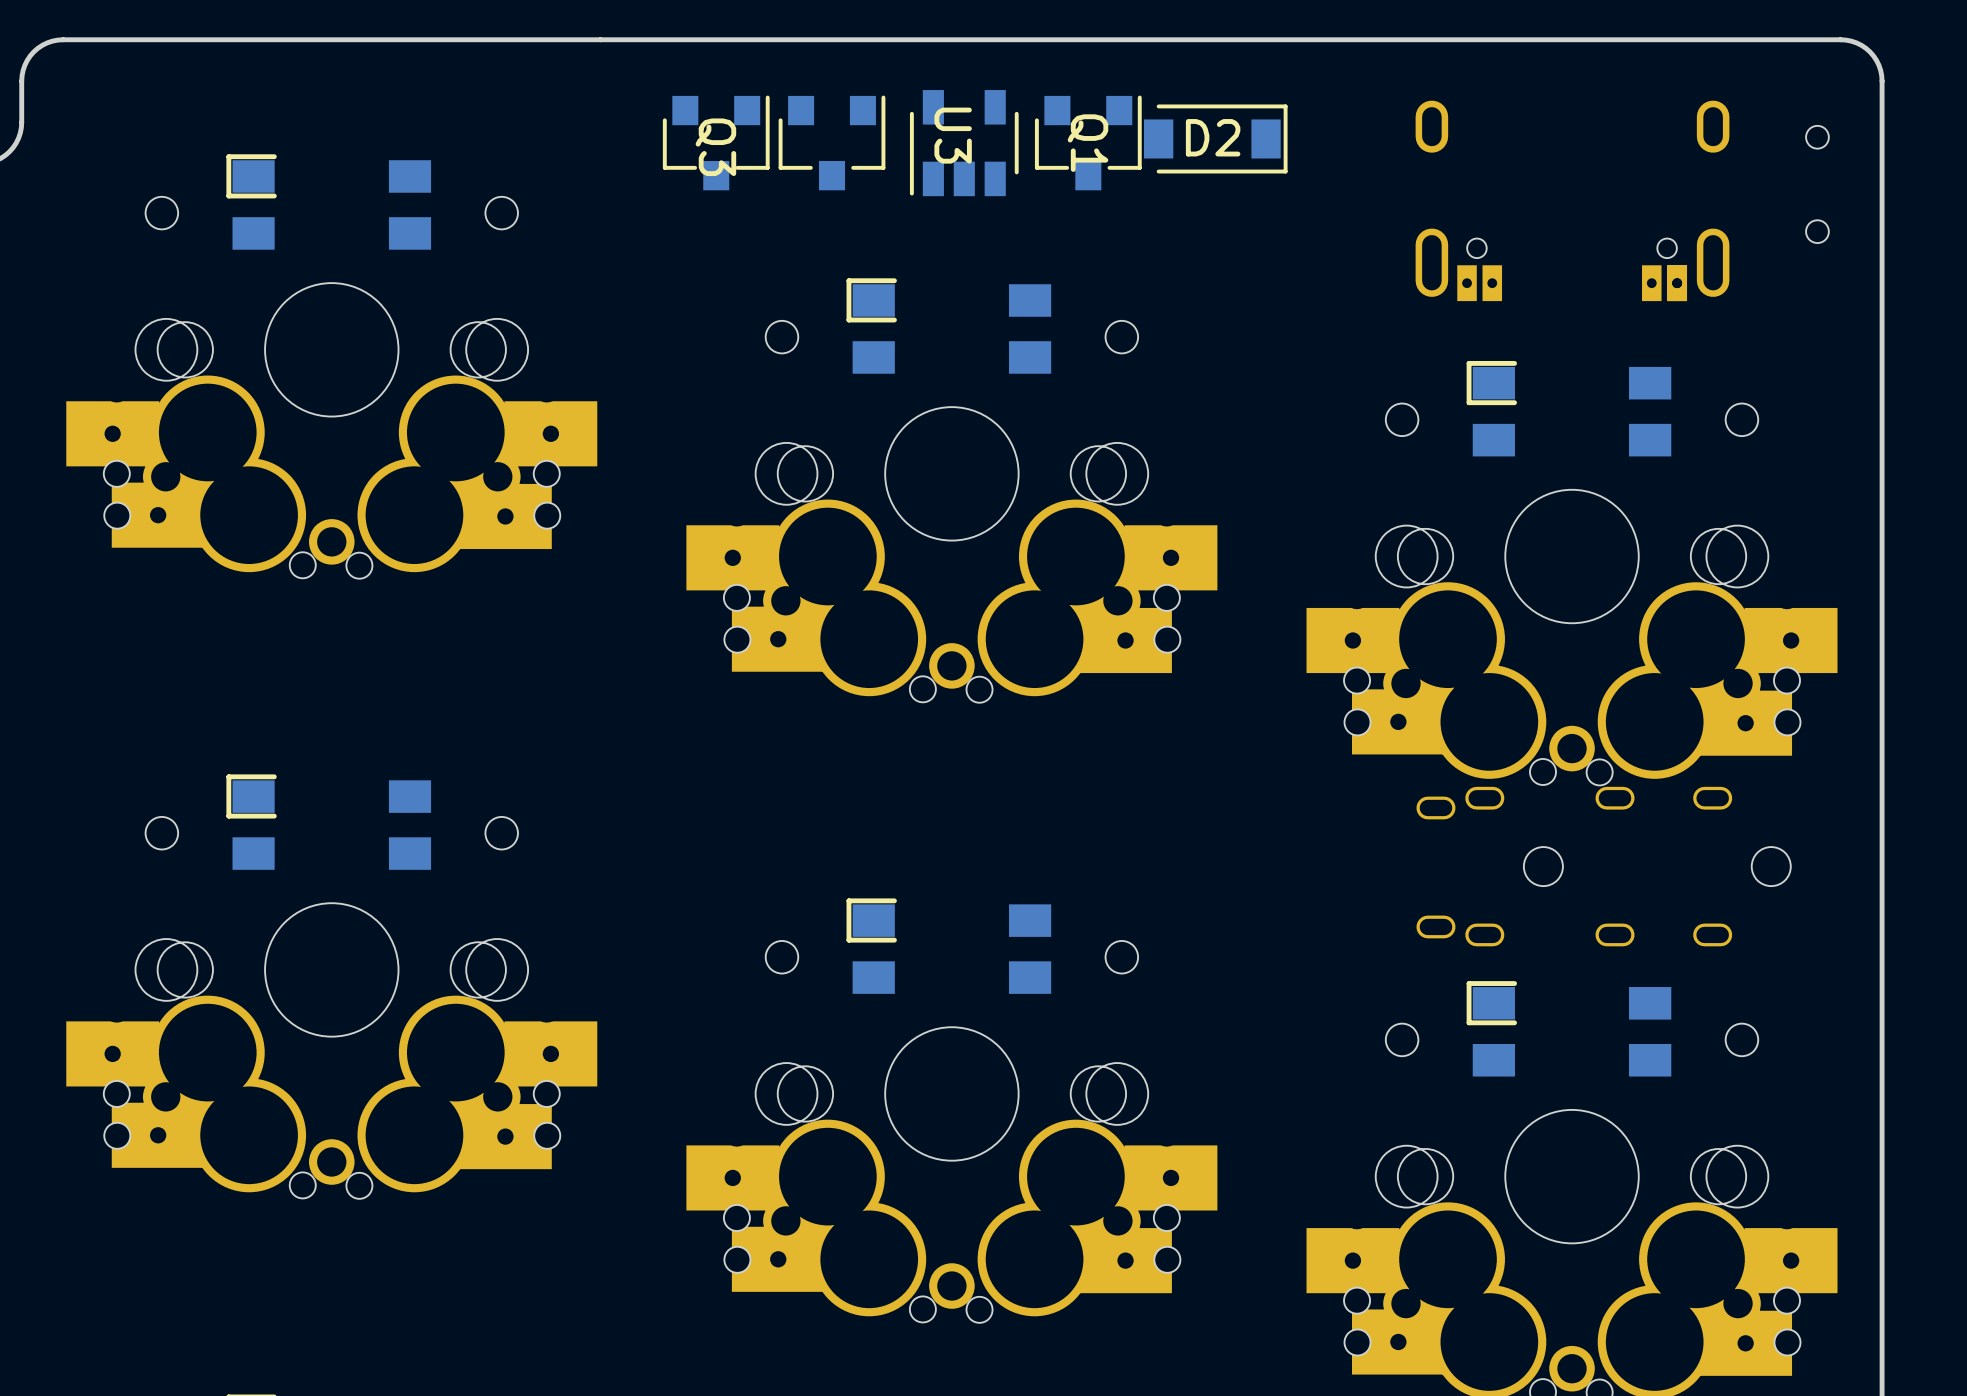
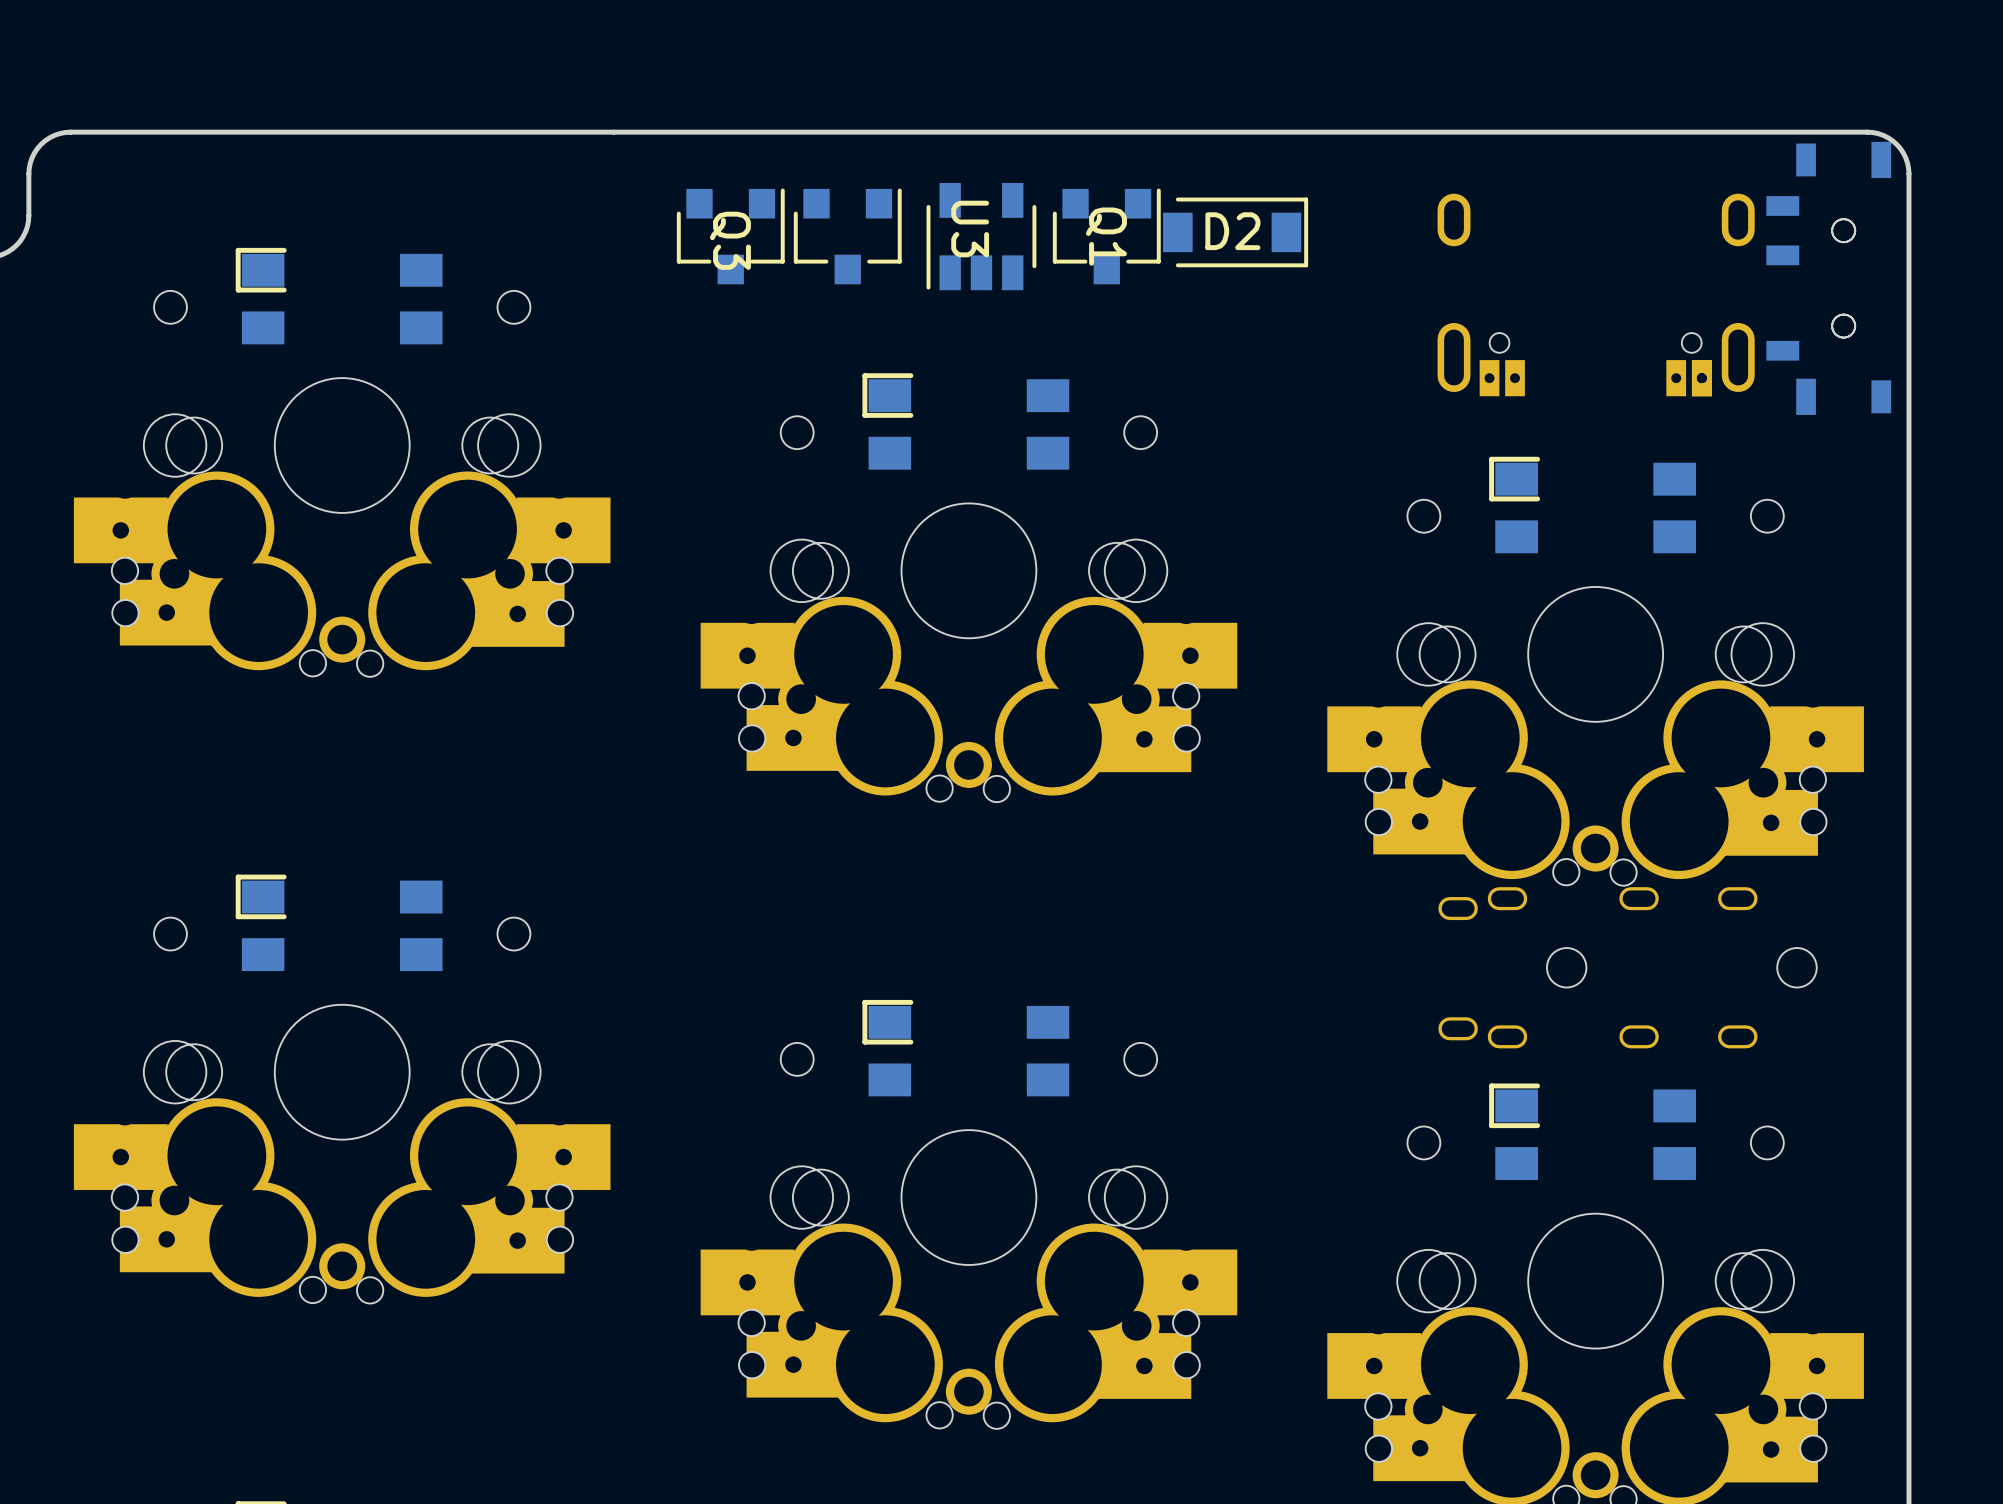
part: none -> (1828, 278)

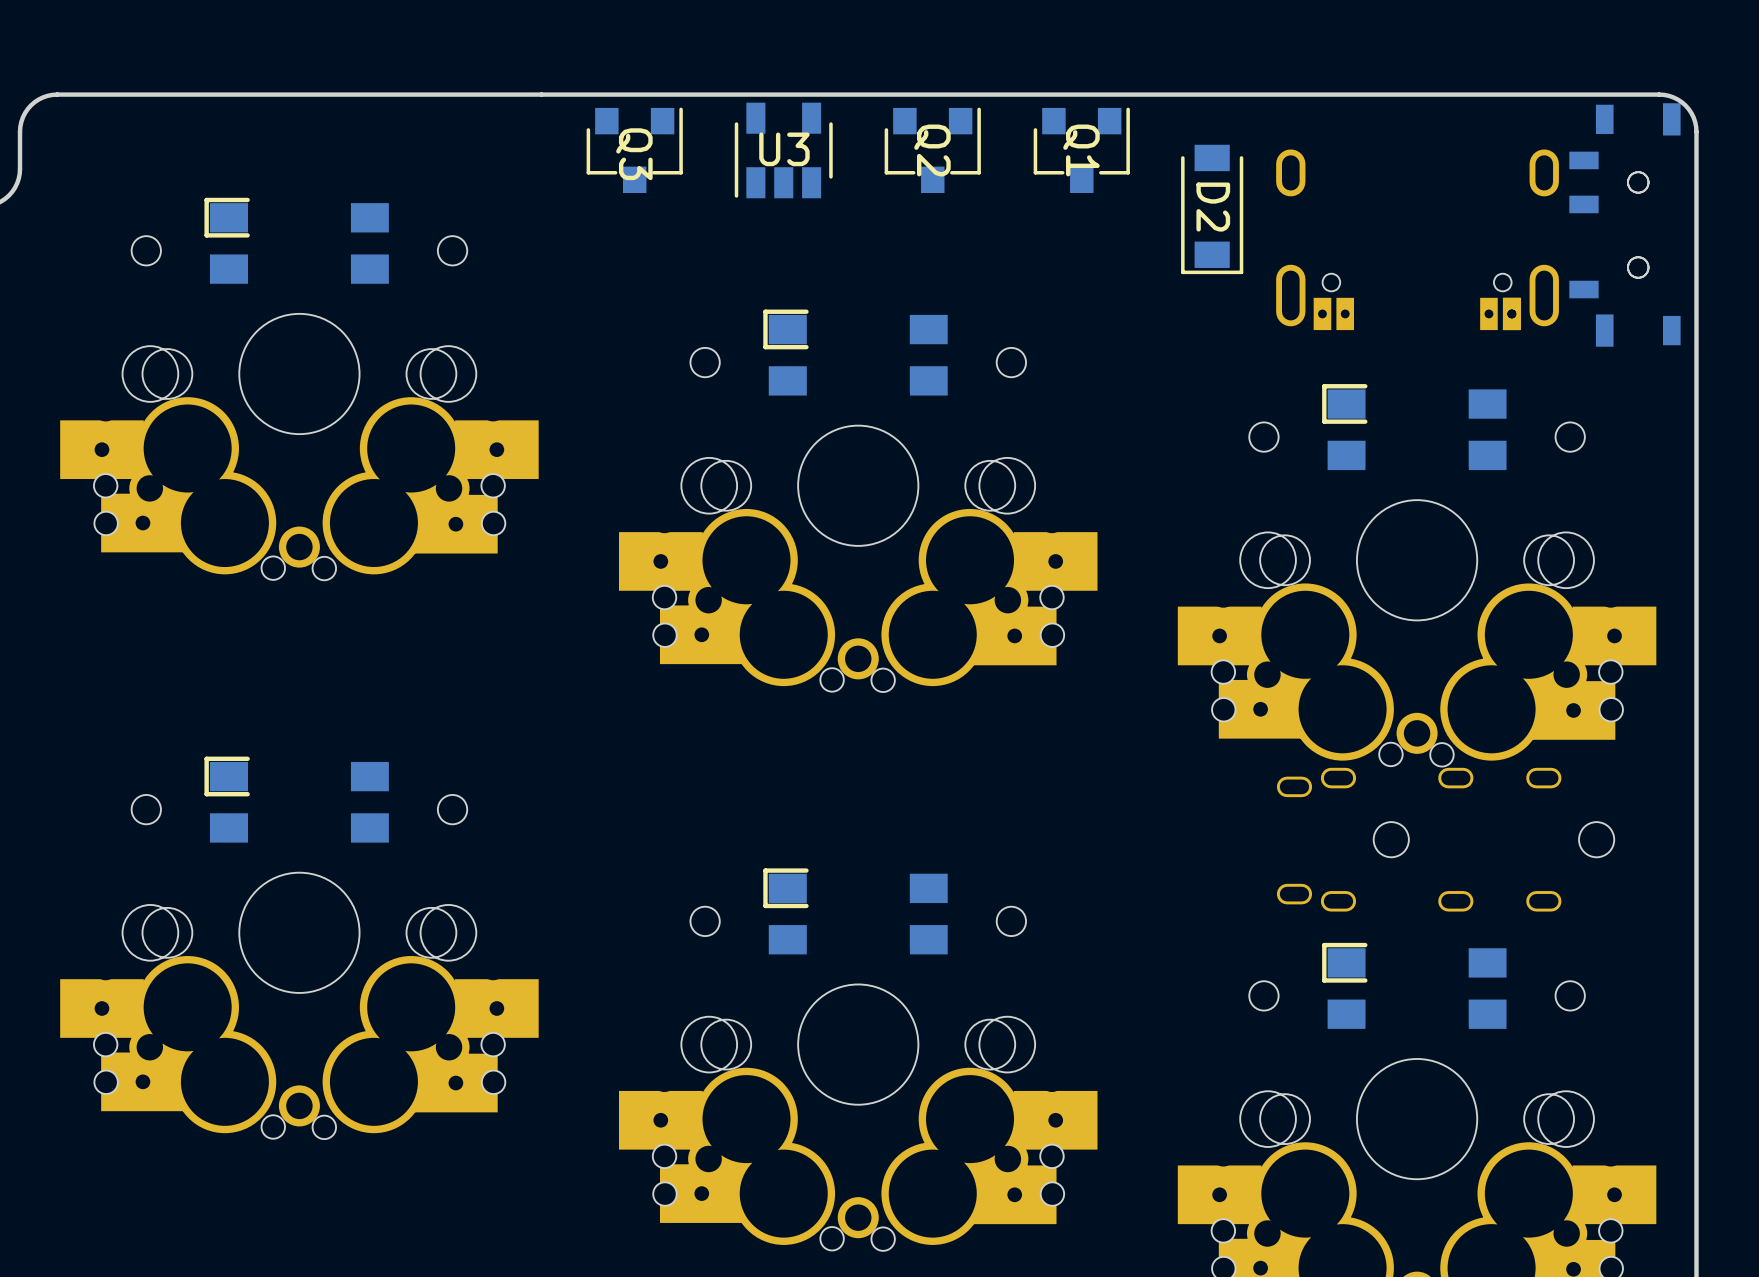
Q2: none -> (932, 150)
U3 name rotation: 0° (970, 229) -> 90° counterclockwise (784, 149)
D2 rotation: 0° (1235, 232) -> 90° clockwise (1212, 209)
D2 position: (1235, 232) -> (1212, 209)
Q3 position: (730, 236) -> (634, 150)
part: (847, 236) -> none
U3 position: (981, 236) -> (783, 150)
Q1 position: (1106, 236) -> (1081, 150)

